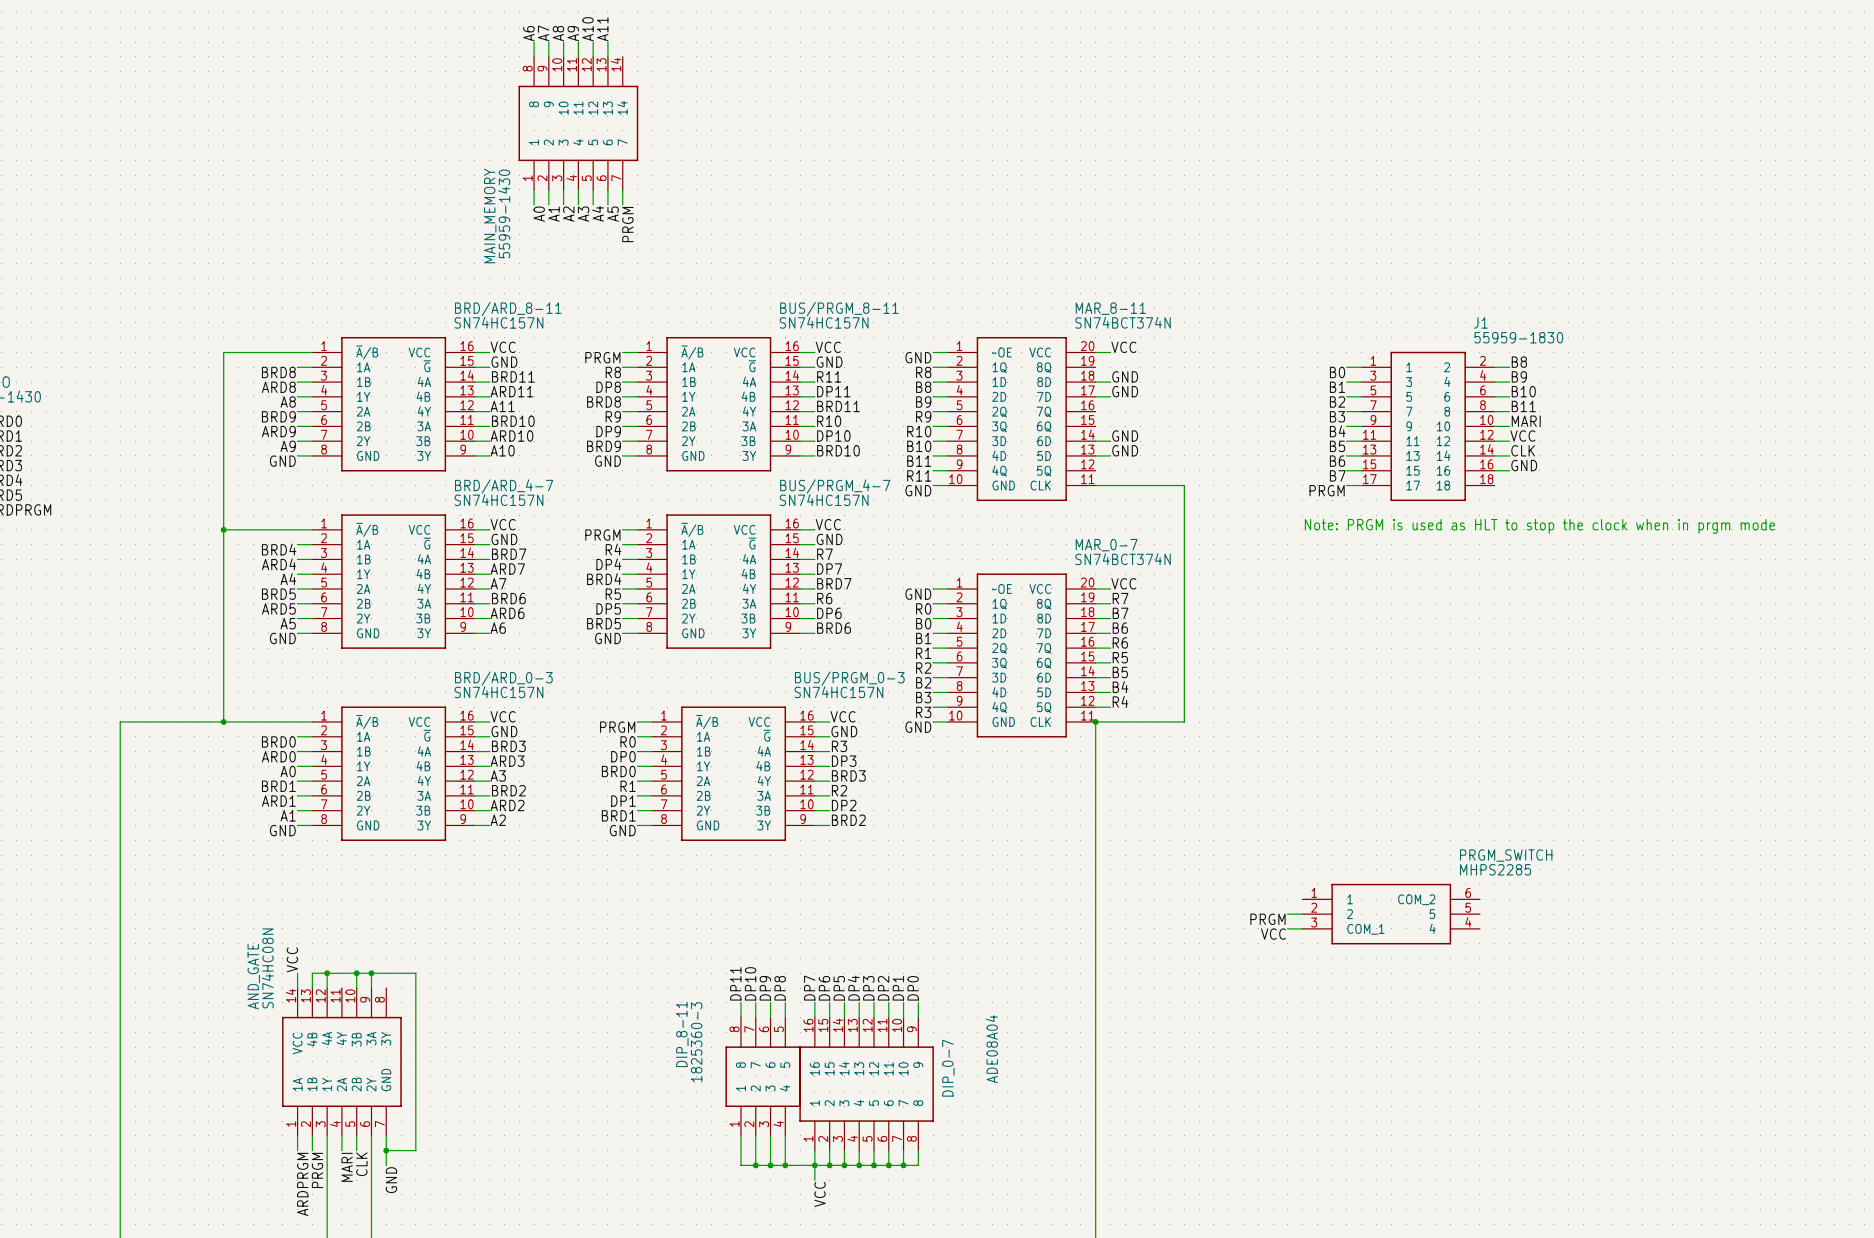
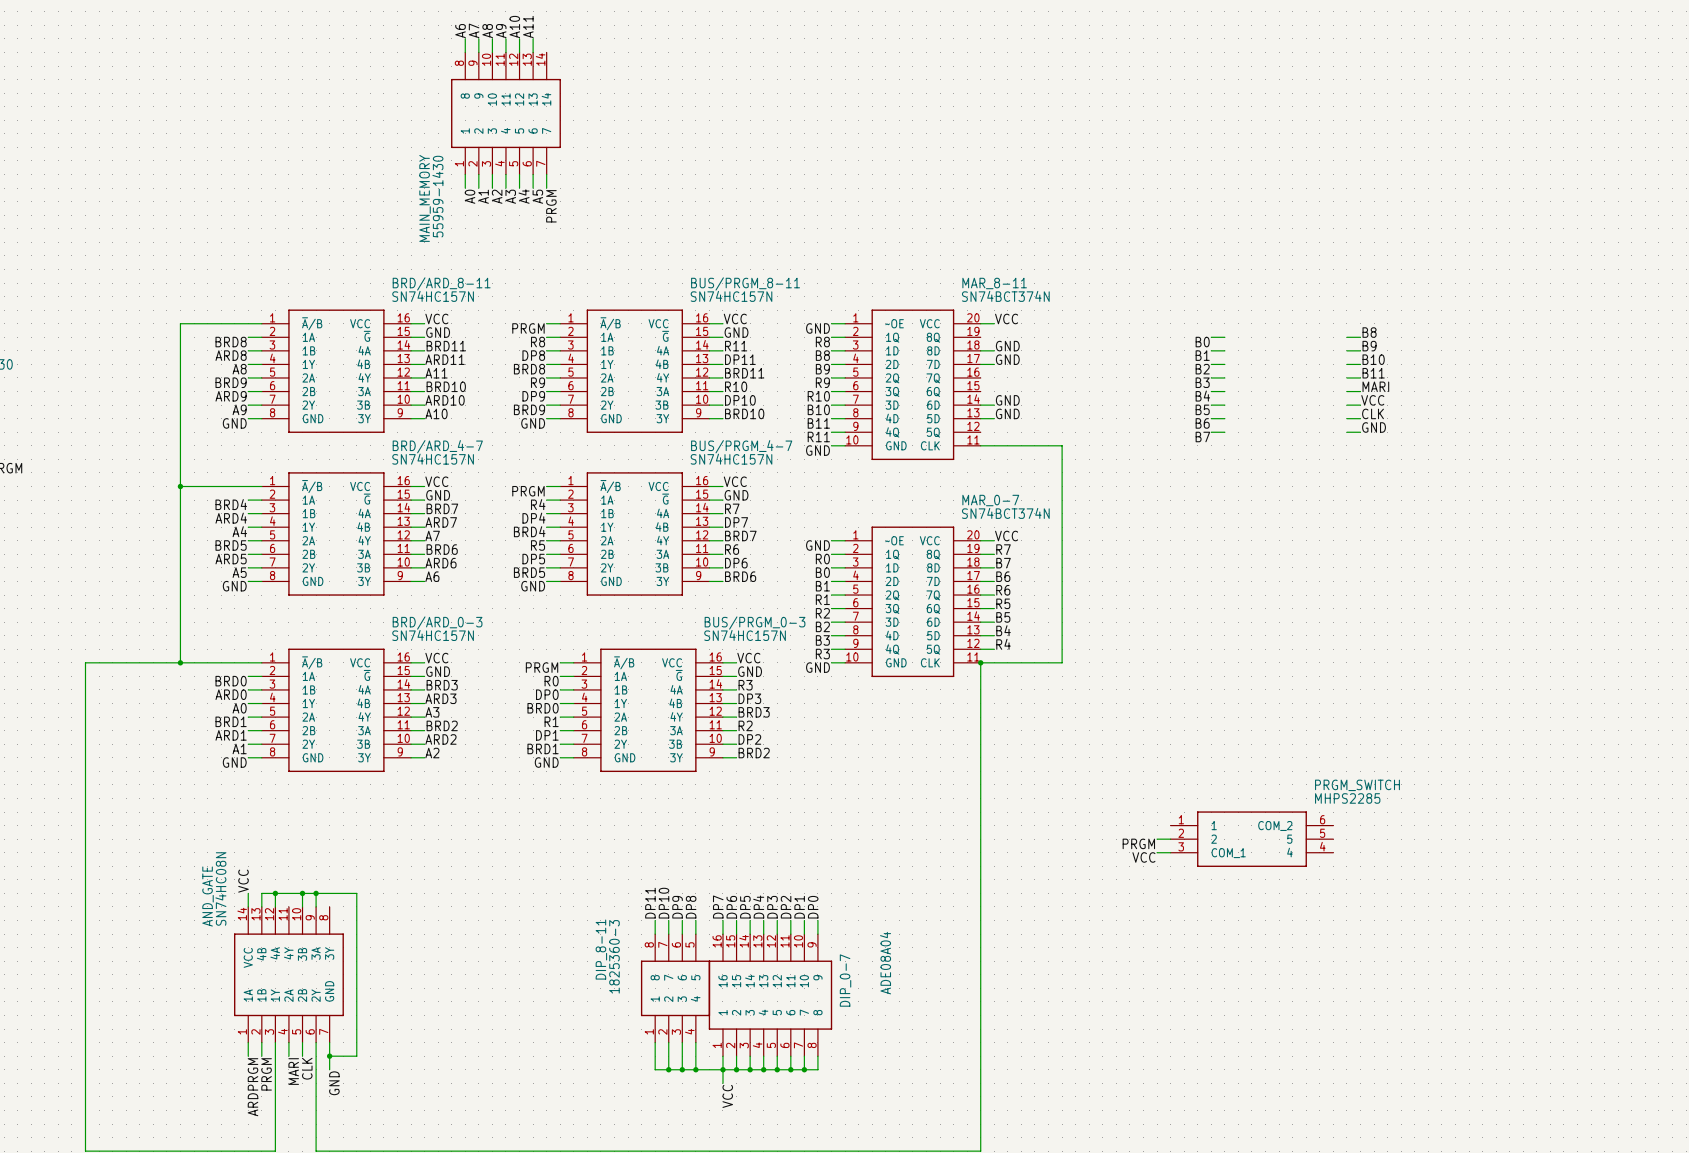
J1: 55959-1830 (1428, 426) -> none
wire: (1346, 485) (1361, 485) -> none
label: PRGM (1327, 490) -> none
text: Note: PRGM is used as HLT to stop the clock when in prgm mode (1539, 526) -> none

